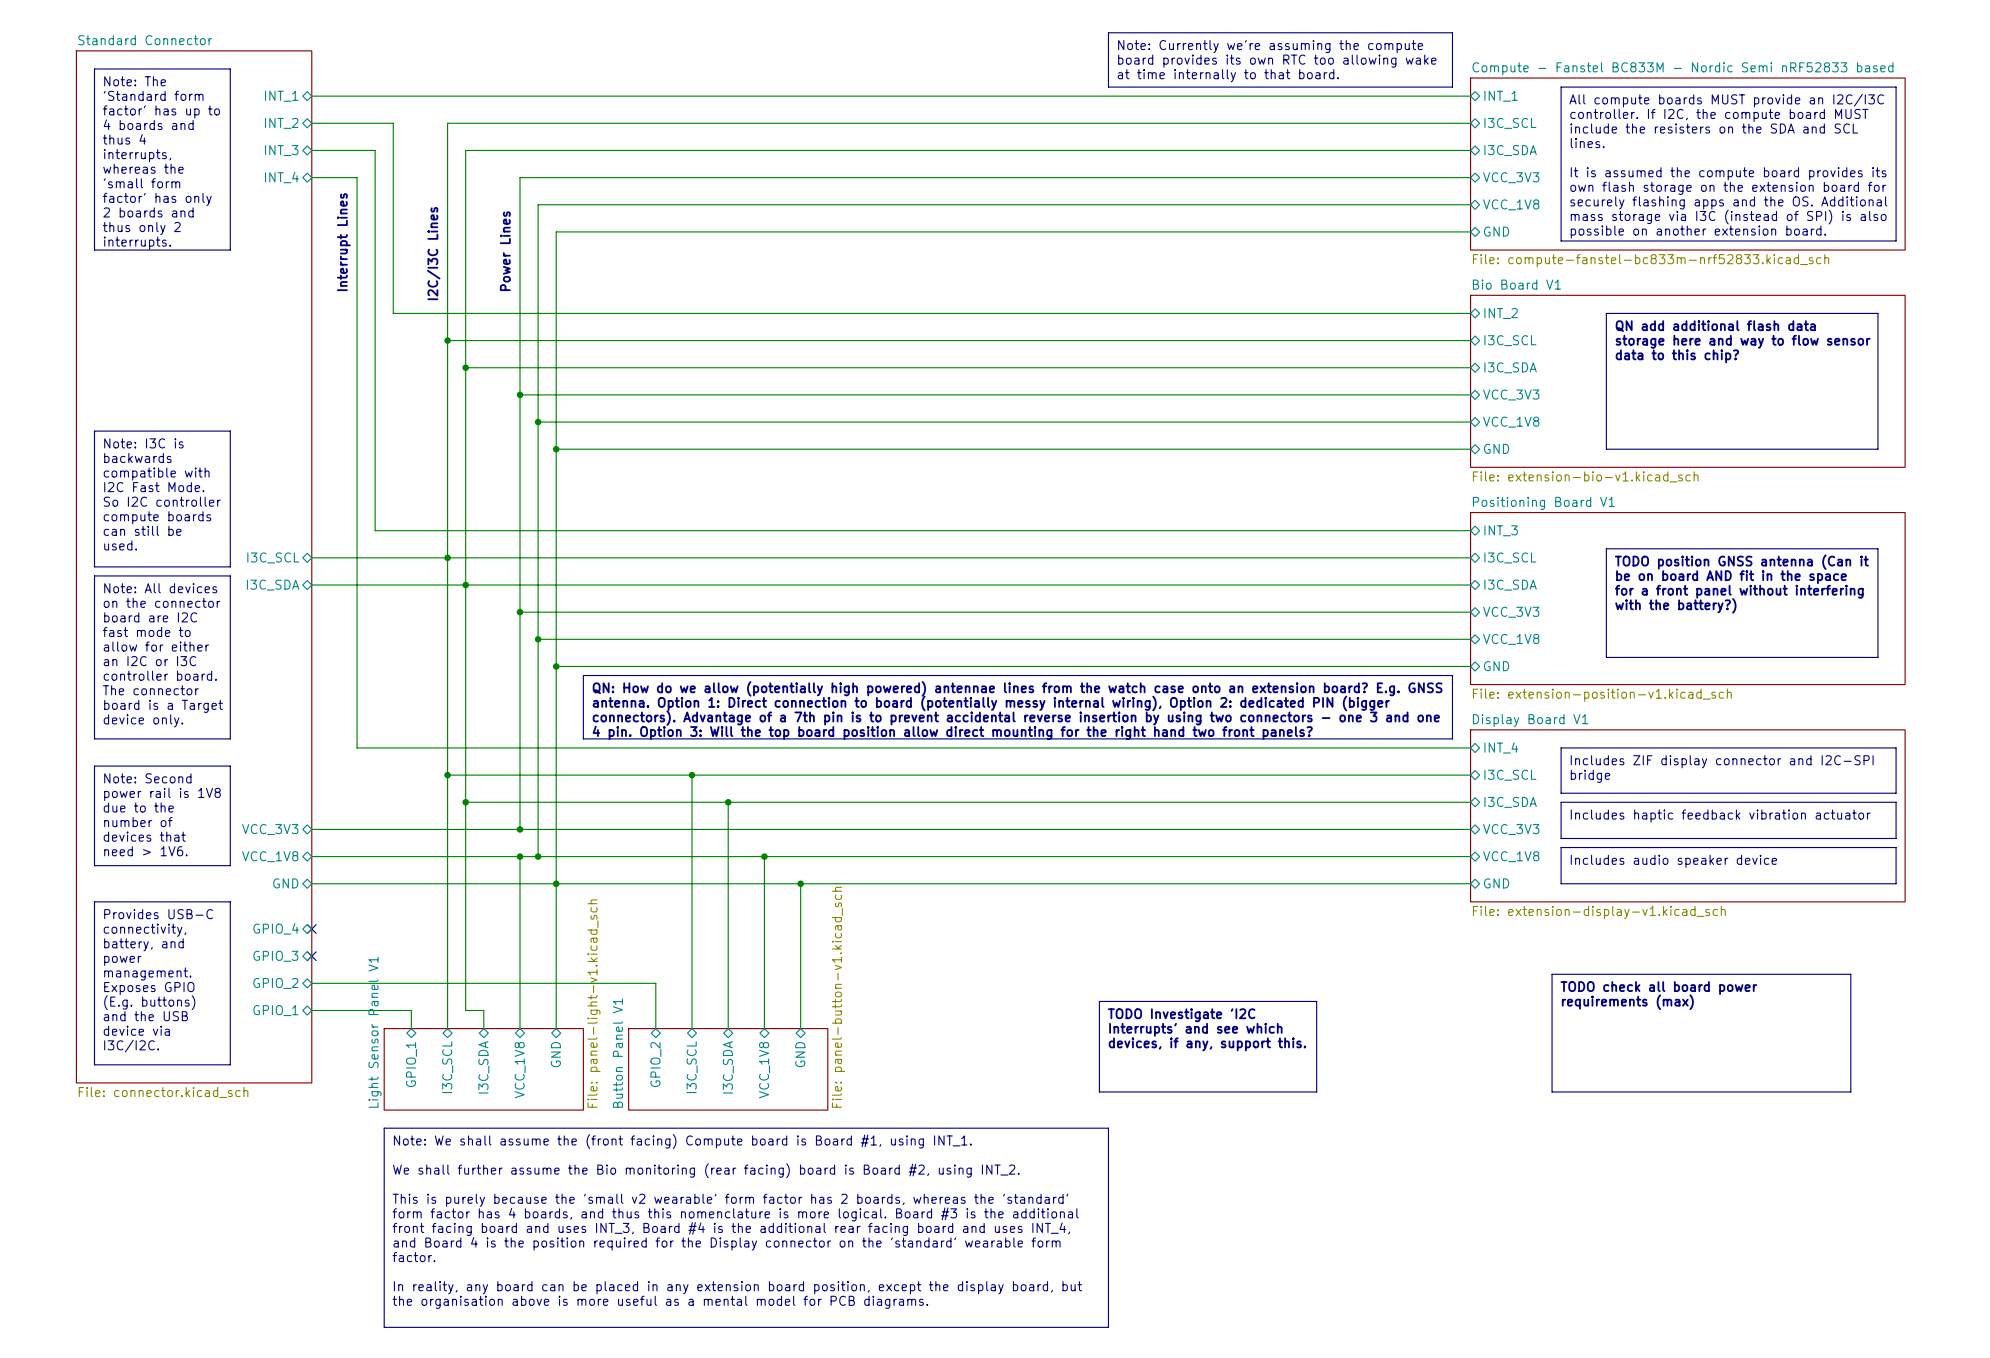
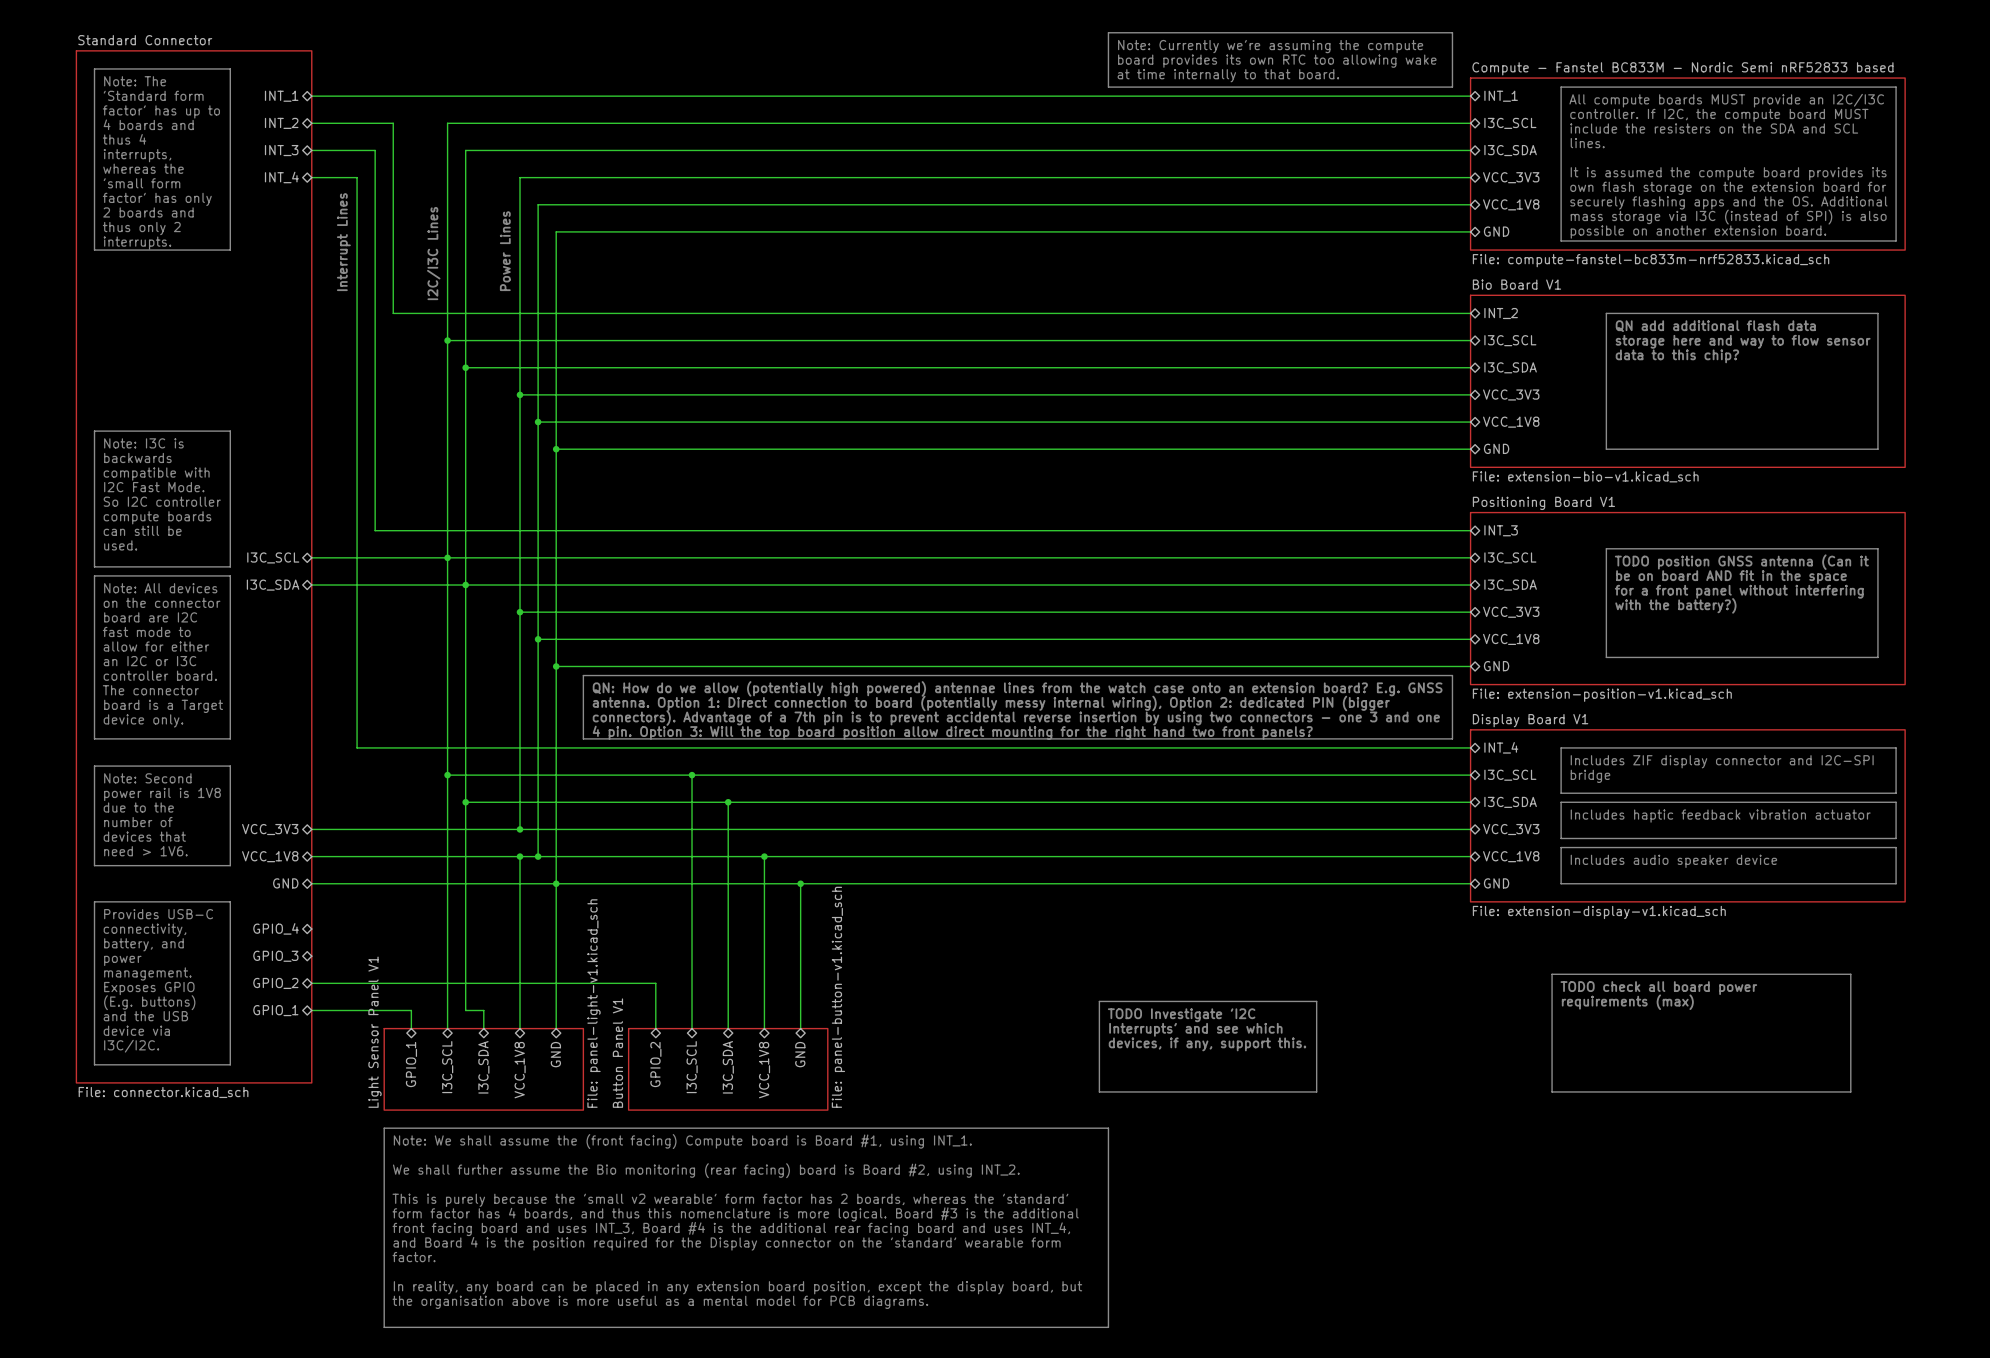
no-connect mark: (311, 929) -> none
no-connect mark: (311, 956) -> none

